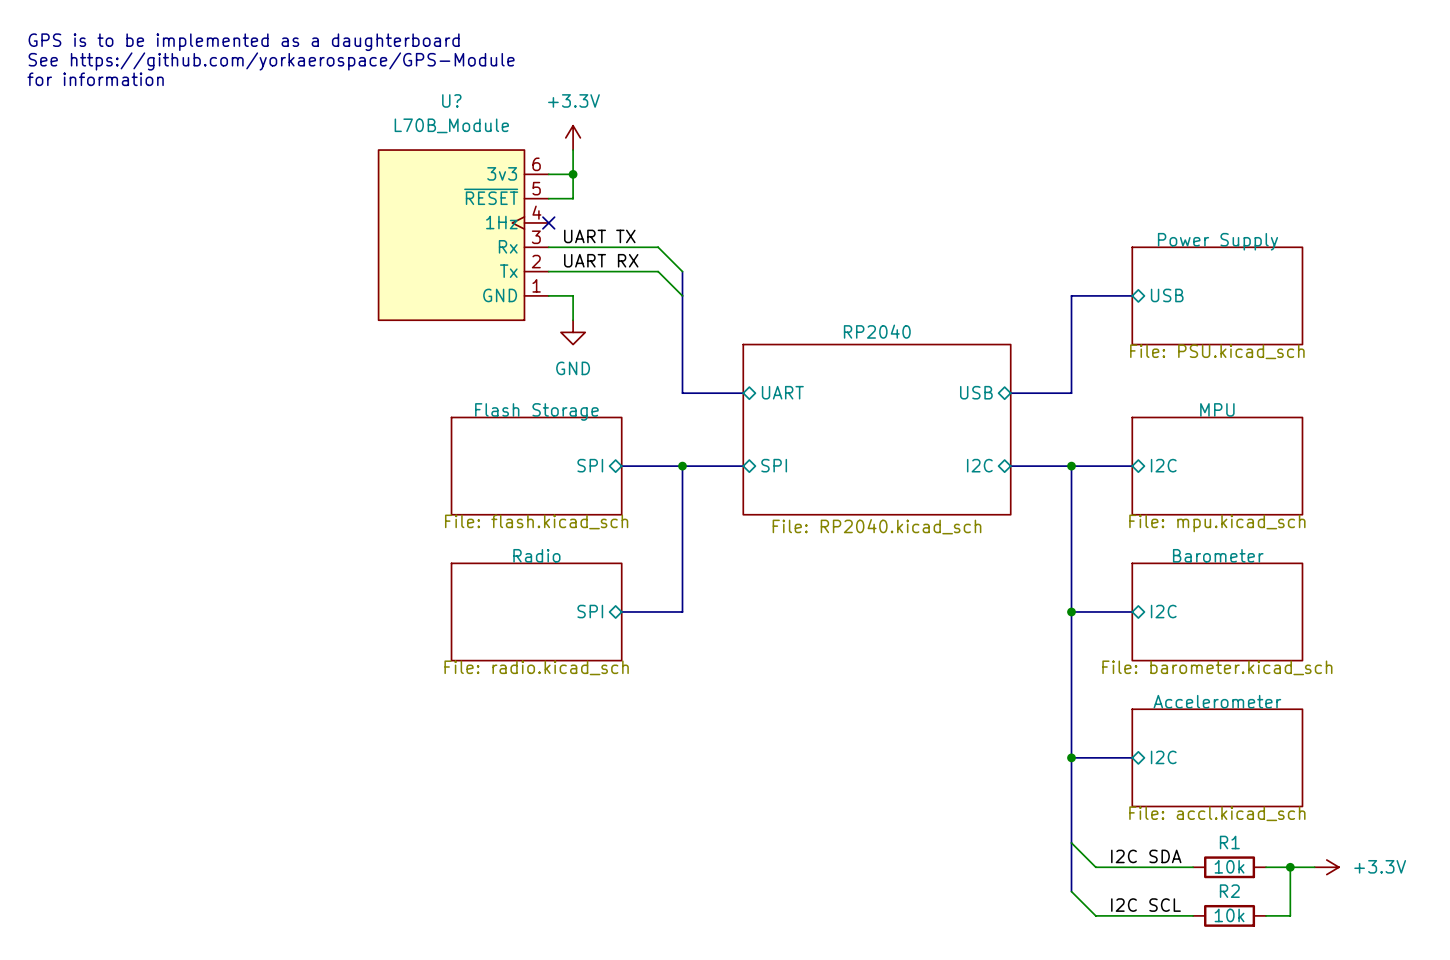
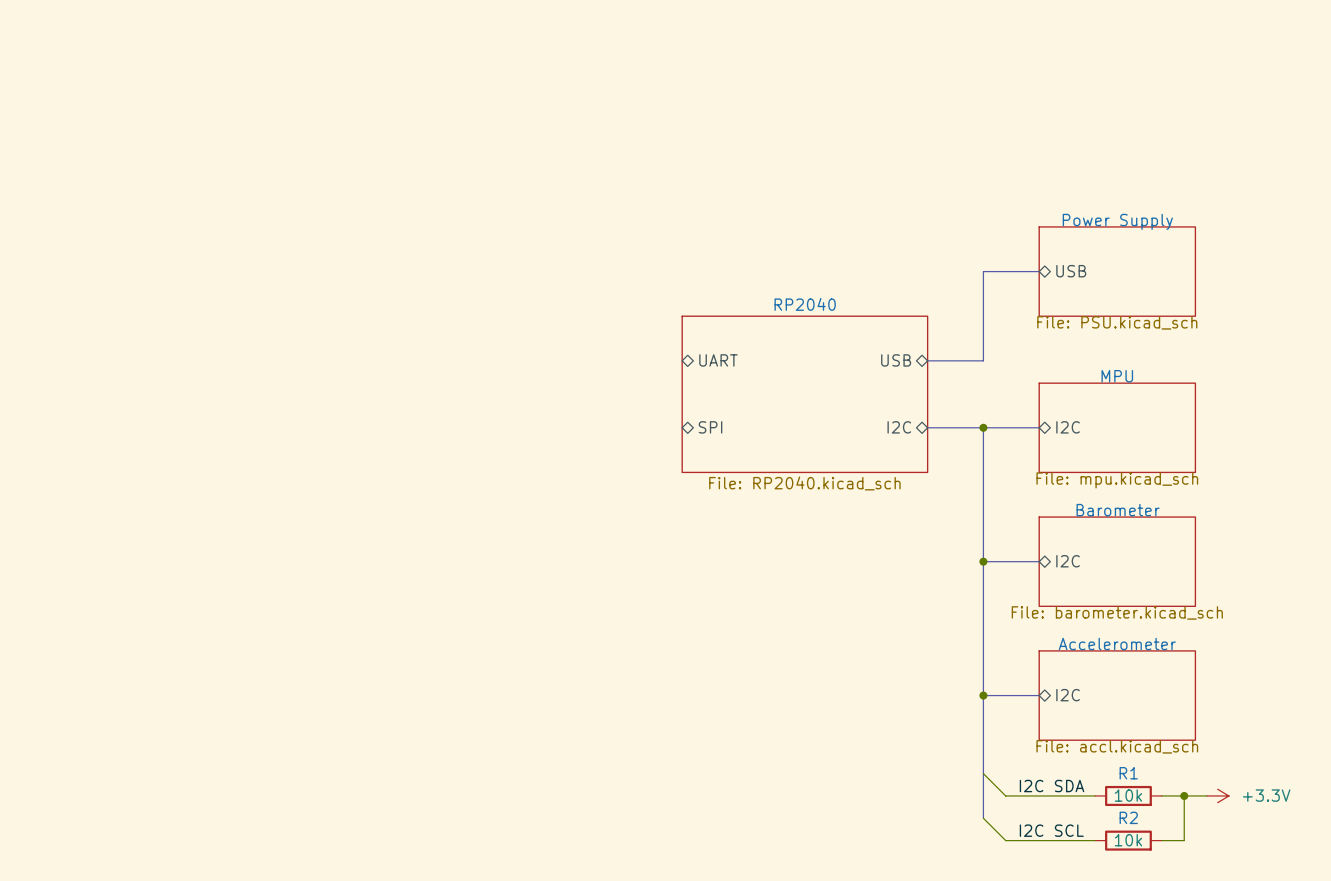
text: GPS is to be implemented as a daughterboard (244, 42) -> none
text: See https://github.com/yorkaerospace/GPS-Module (271, 61) -> none
text: for information (95, 79) -> none
power symbol: +3.3V (573, 137) -> none
wire: (573, 150) (573, 198) (548, 198) -> none
wire: (548, 174) (573, 174) -> none
junction: (573, 174) -> none
no-connect mark: (548, 222) -> none
U?: L70B_Module (463, 235) -> none
label: UART TX (599, 236) -> none
wire: (548, 247) (658, 247) (682, 271) -> none
label: UART RX (601, 260) -> none
wire: (548, 271) (658, 271) (682, 295) -> none
bus: (682, 271) (682, 393) (743, 393) -> none
wire: (548, 295) (573, 295) (573, 320) -> none
power symbol: GND (573, 332) -> none
sheet pin: SPI (590, 465) -> none
sheet Flash Storage: File: flash.kicad_sch (536, 466) -> none
bus: (621, 466) (743, 466) -> none
bus: (682, 466) (682, 611) (621, 611) -> none
junction: (682, 466) -> none
sheet Radio: File: radio.kicad_sch (536, 611) -> none
sheet pin: SPI (590, 611) -> none

